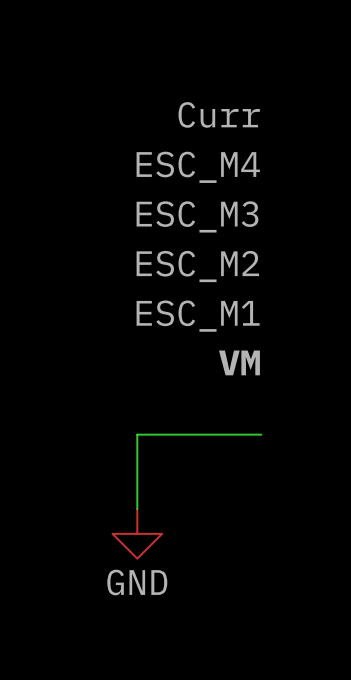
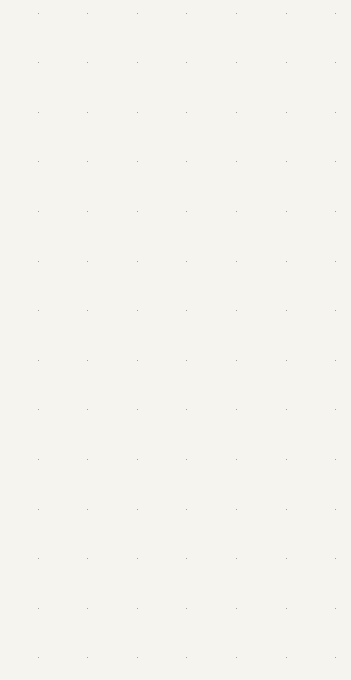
label: Curr (219, 114) -> none
label: ESC_M4 (198, 167) -> none
label: ESC_M3 (197, 216) -> none
label: ESC_M2 (197, 266) -> none
label: ESC_M1 (198, 316) -> none
label: VM (239, 362) -> none
wire: (261, 434) (137, 434) (137, 509) -> none
power symbol: GND (137, 533) -> none

